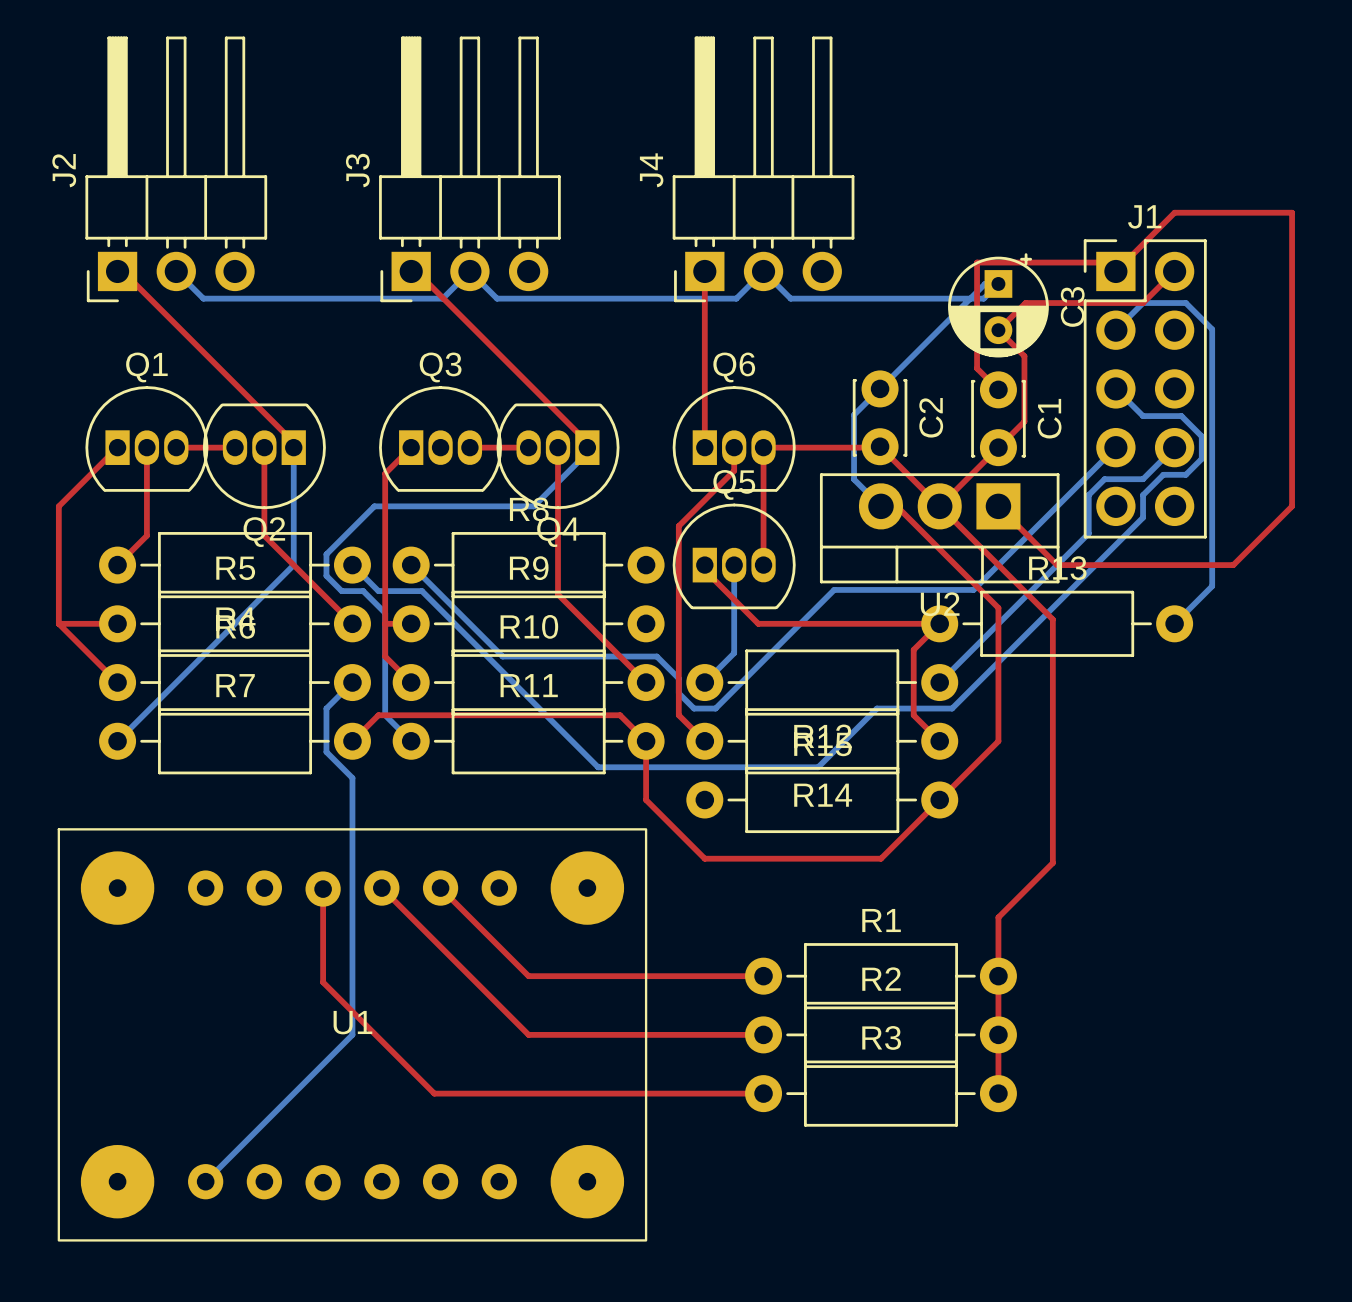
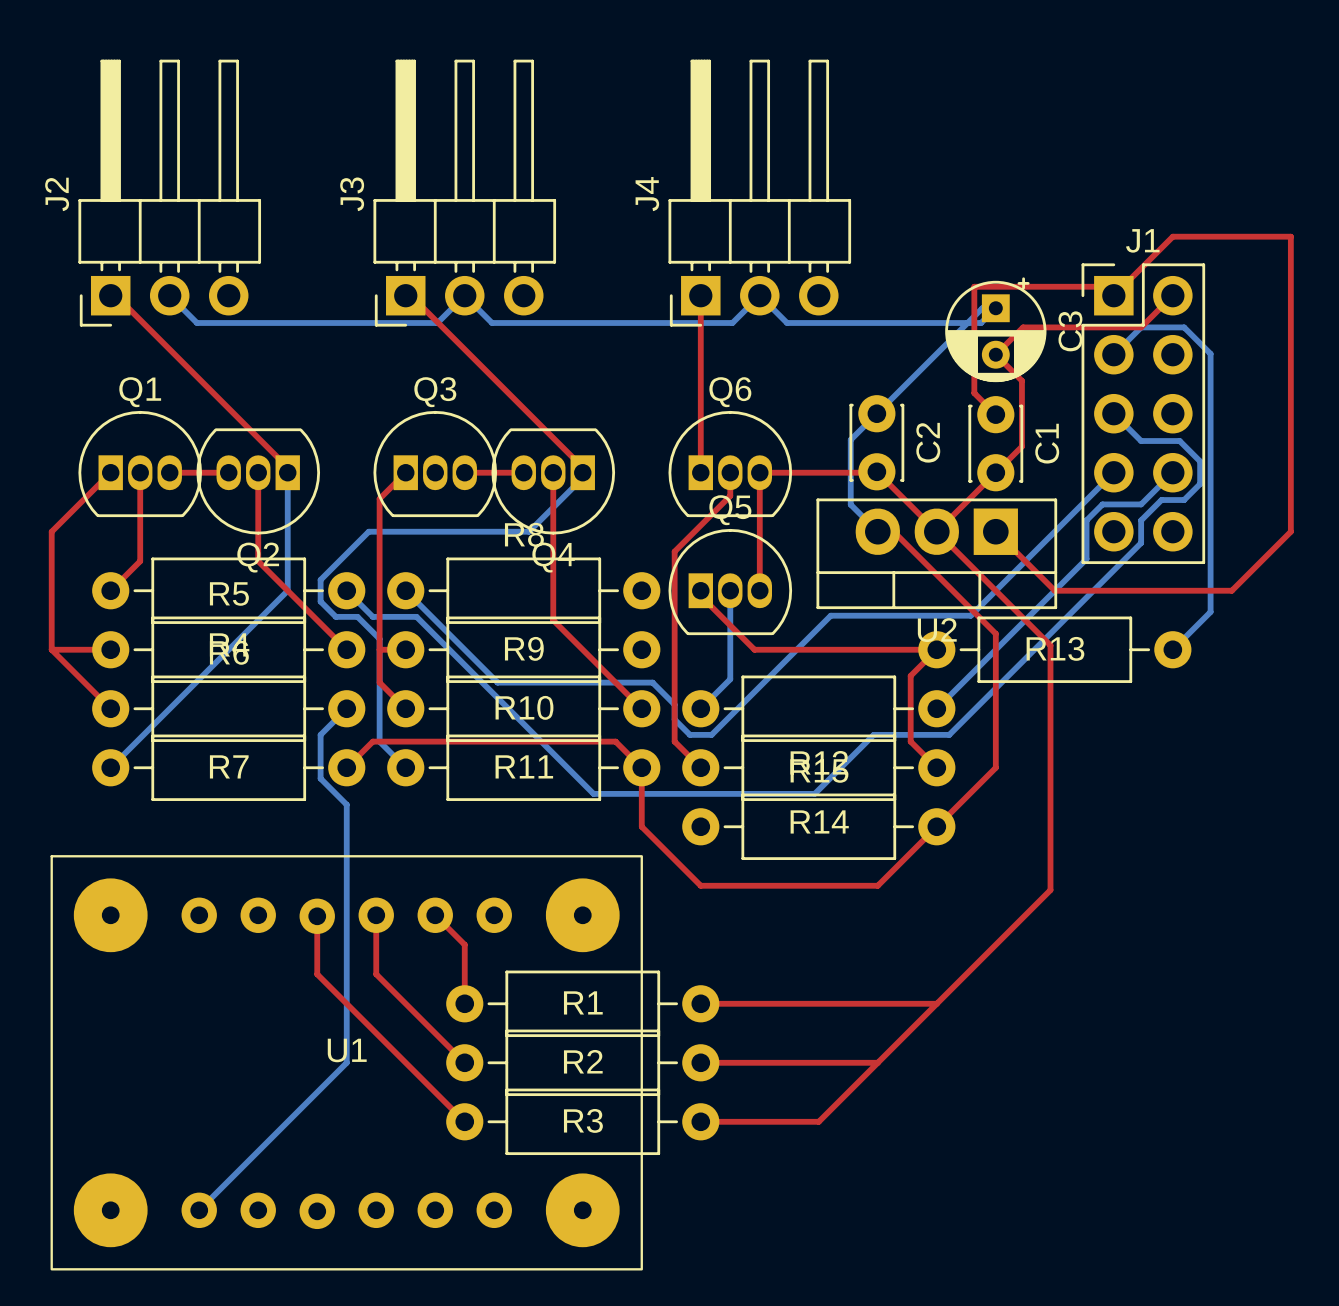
R9 name position: R9 (529, 568) -> R9 (524, 648)
R13 name position: R13 (1057, 568) -> R13 (1055, 648)
R10 name position: R10 (529, 626) -> R10 (524, 707)
R7 name position: R7 (235, 685) -> R7 (229, 766)
R11 name position: R11 (529, 685) -> R11 (524, 766)
top track: (381, 888) (528, 1034) (704, 1034) -> (376, 915) (376, 974) (464, 1062)
top track: (469, 917) (528, 976) (704, 976) -> (464, 944) (464, 1003)
top track: (998, 917) (998, 1093) -> (995, 944) (818, 1121) (759, 1121)
R1 name position: R1 (881, 920) -> R1 (583, 1002)
top track: (323, 946) (323, 982) (434, 1093) (704, 1093) -> (317, 974) (464, 1121)
top track: none -> (759, 1003) (936, 1003)
R1 position: (880, 976) -> (582, 1003)
R2 name position: R2 (881, 979) -> R2 (583, 1061)
top track: none -> (759, 1062) (877, 1062)
R2 position: (880, 1034) -> (582, 1062)
R3 name position: R3 (881, 1037) -> R3 (583, 1120)
R3 position: (880, 1093) -> (582, 1121)

